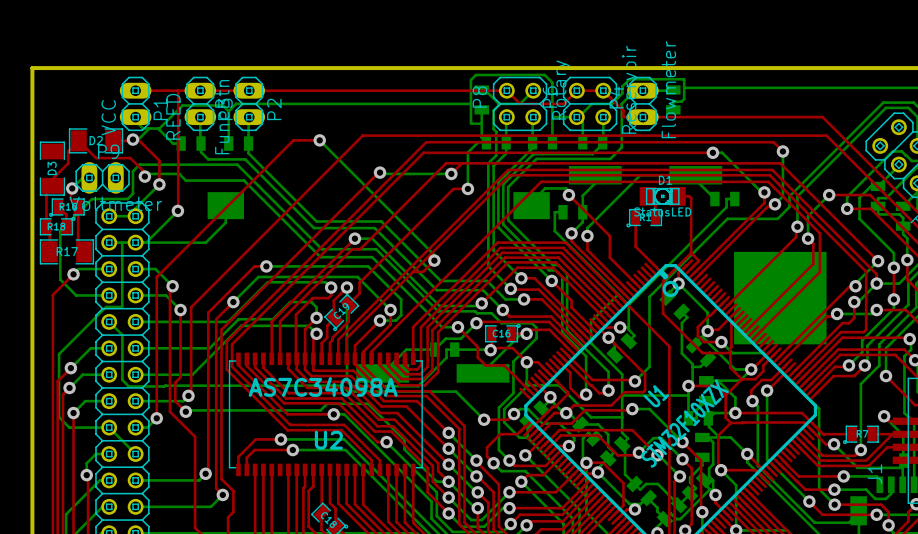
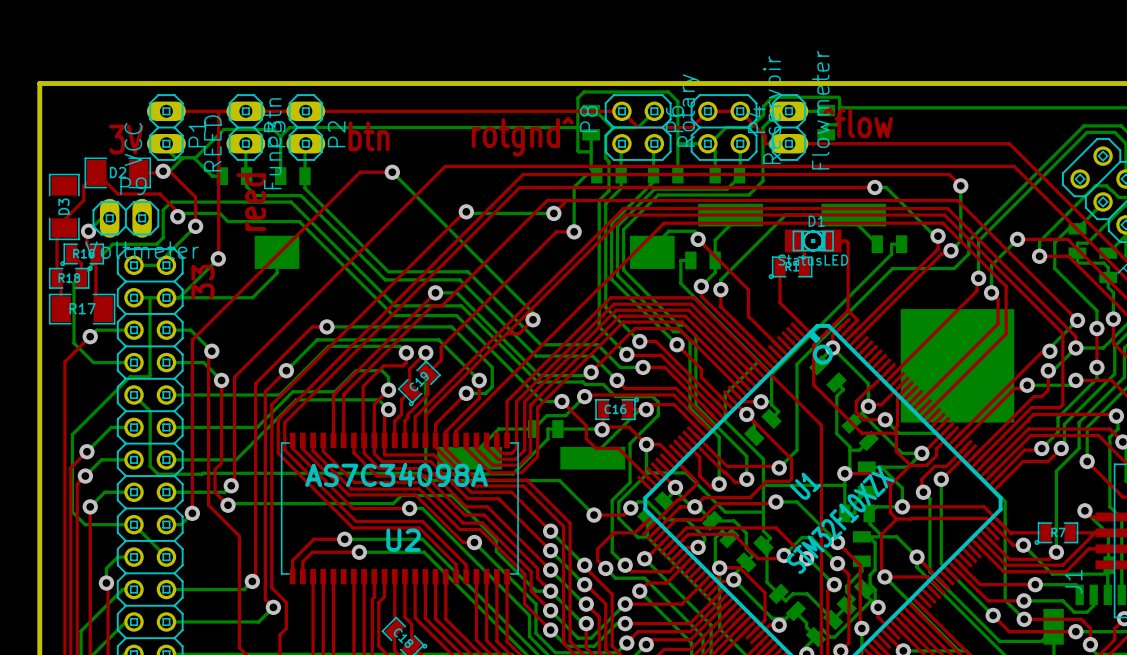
text: none -> ^flow (858, 122)
text: none -> btn (369, 136)
text: none -> rotgnd^ (522, 136)
text: none -> 3V (126, 139)
text: none -> reed (251, 202)
text: none -> 33 (202, 281)
bottom track: none -> (902, 594) (958, 650)
bottom track: (736, 485) (736, 530) -> none

